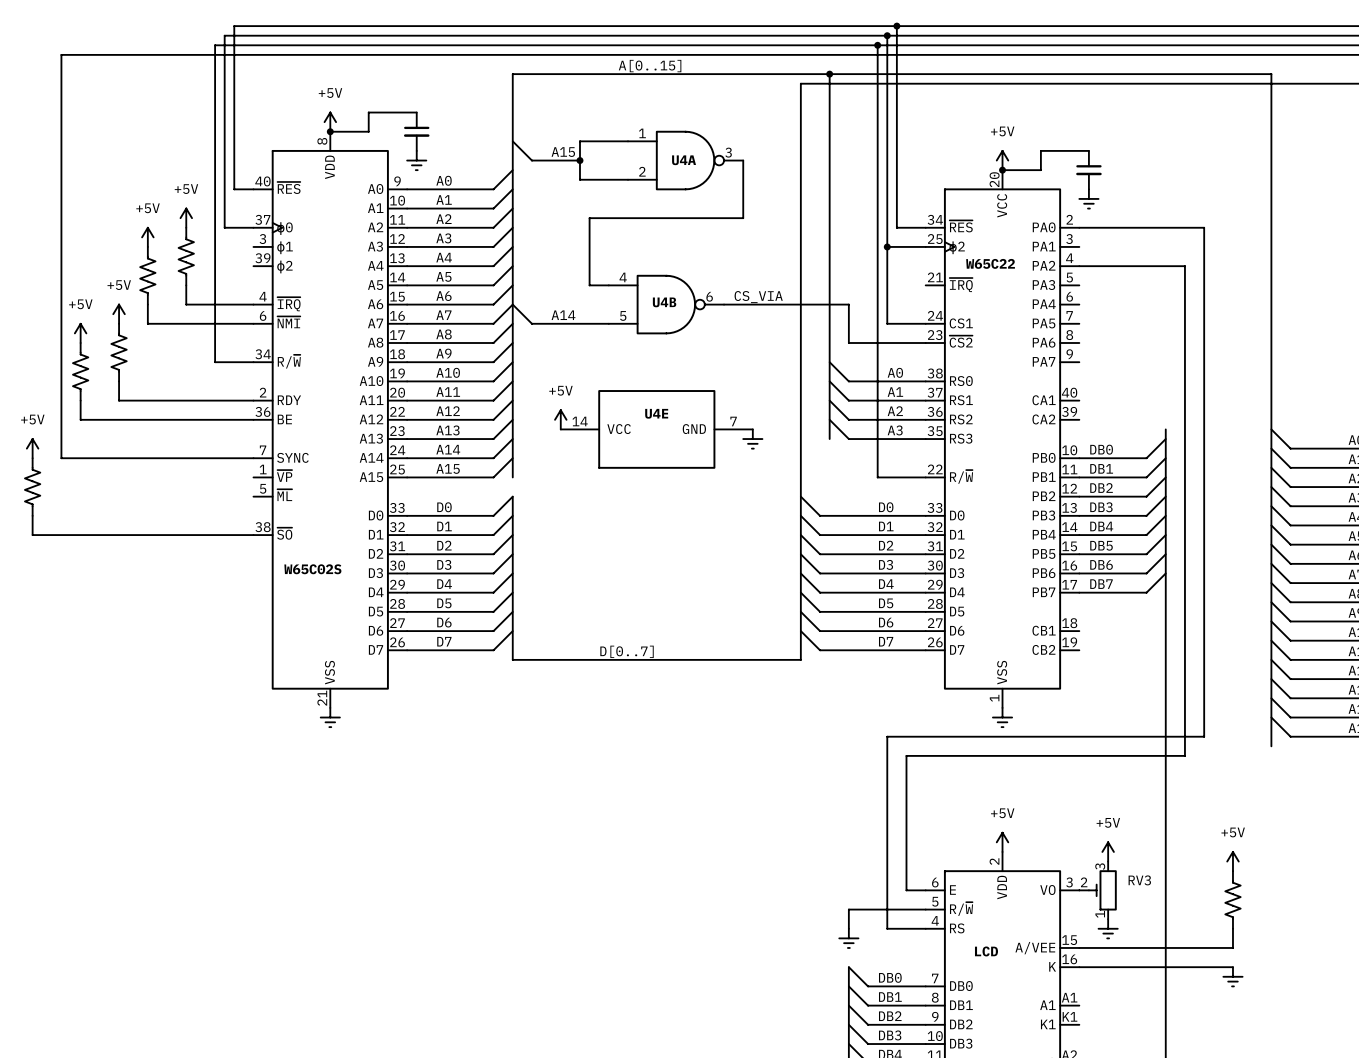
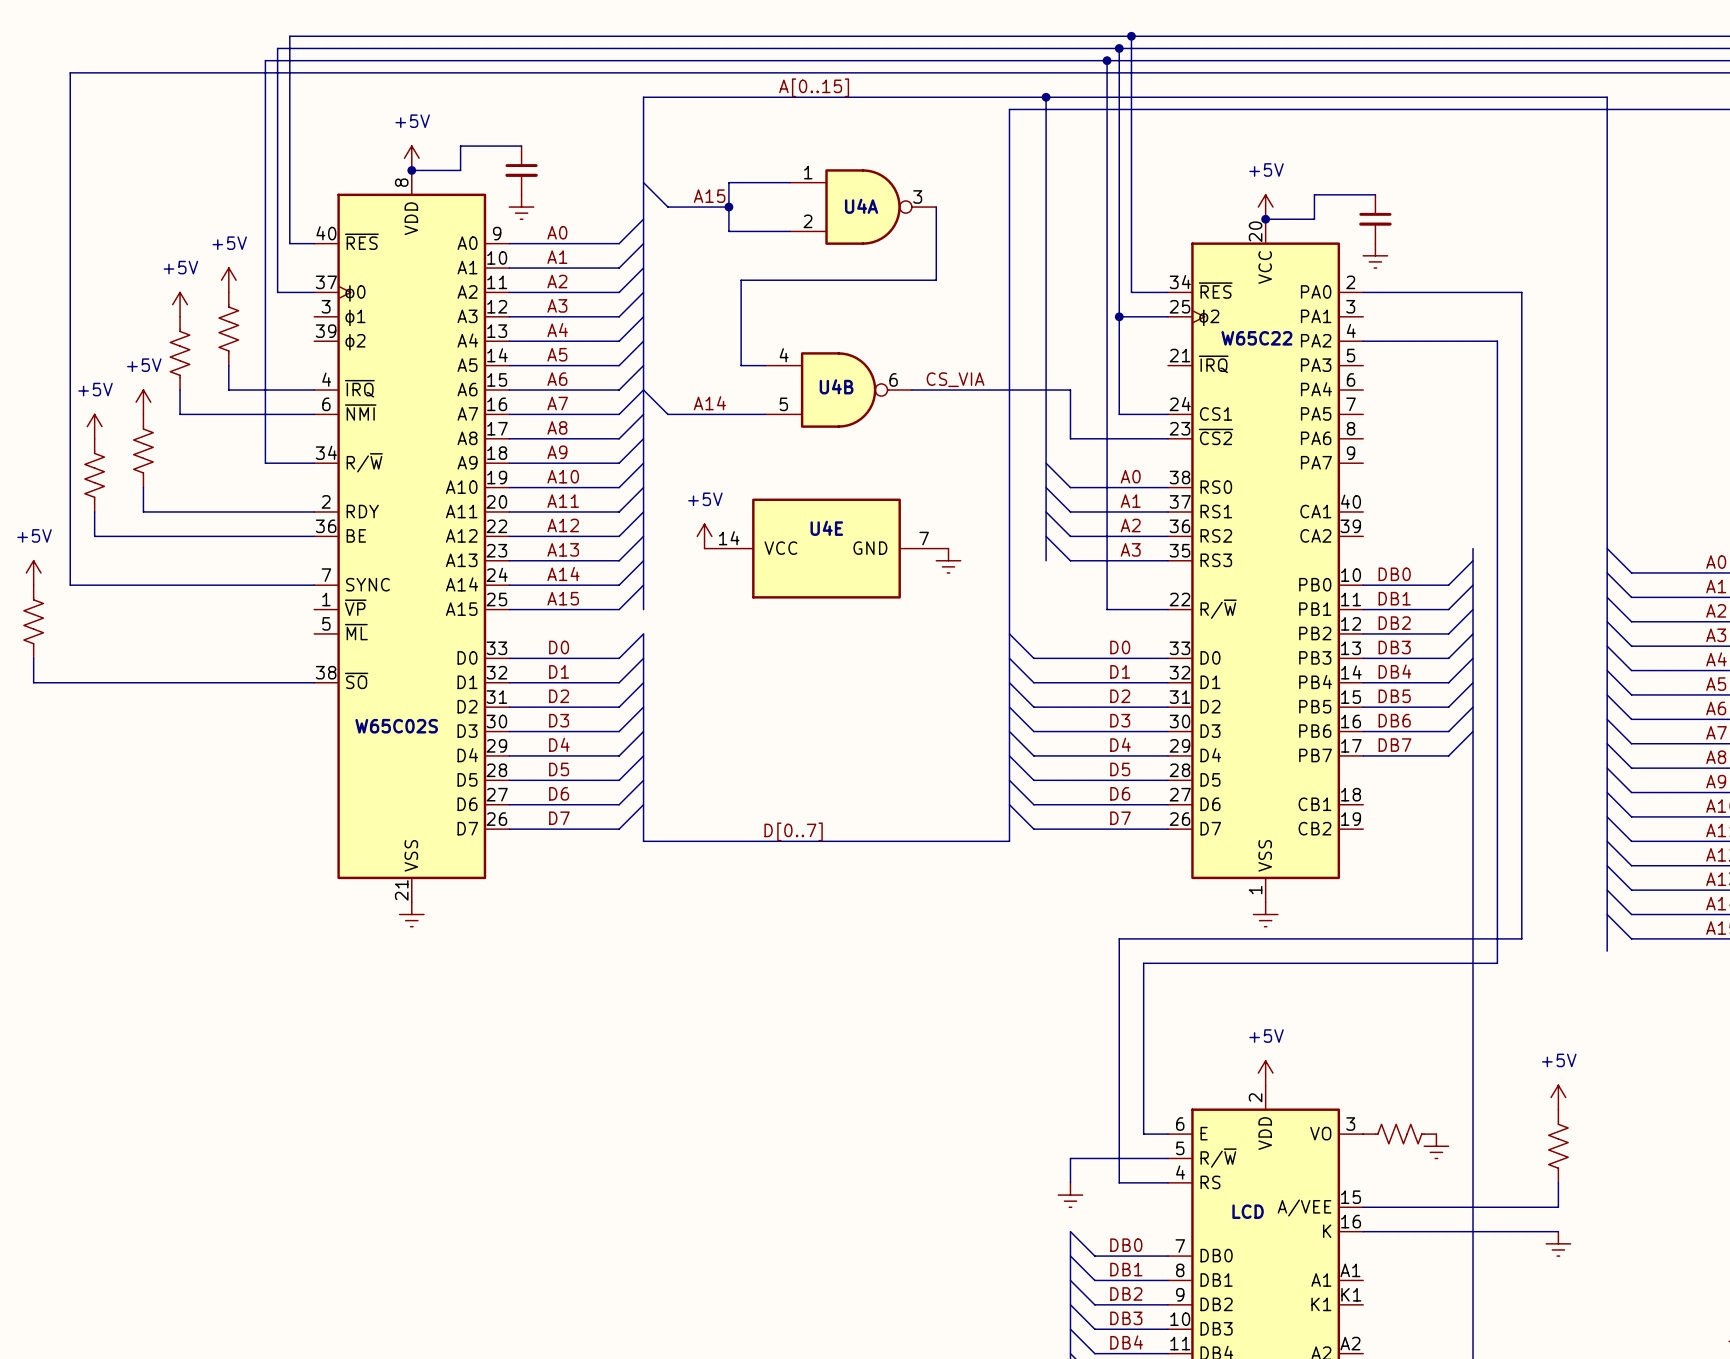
power symbol: +5V (1108, 851) -> none
RV3: (1098, 890) -> none
part: none -> (1399, 1134)
power symbol position: (1108, 928) -> (1436, 1146)

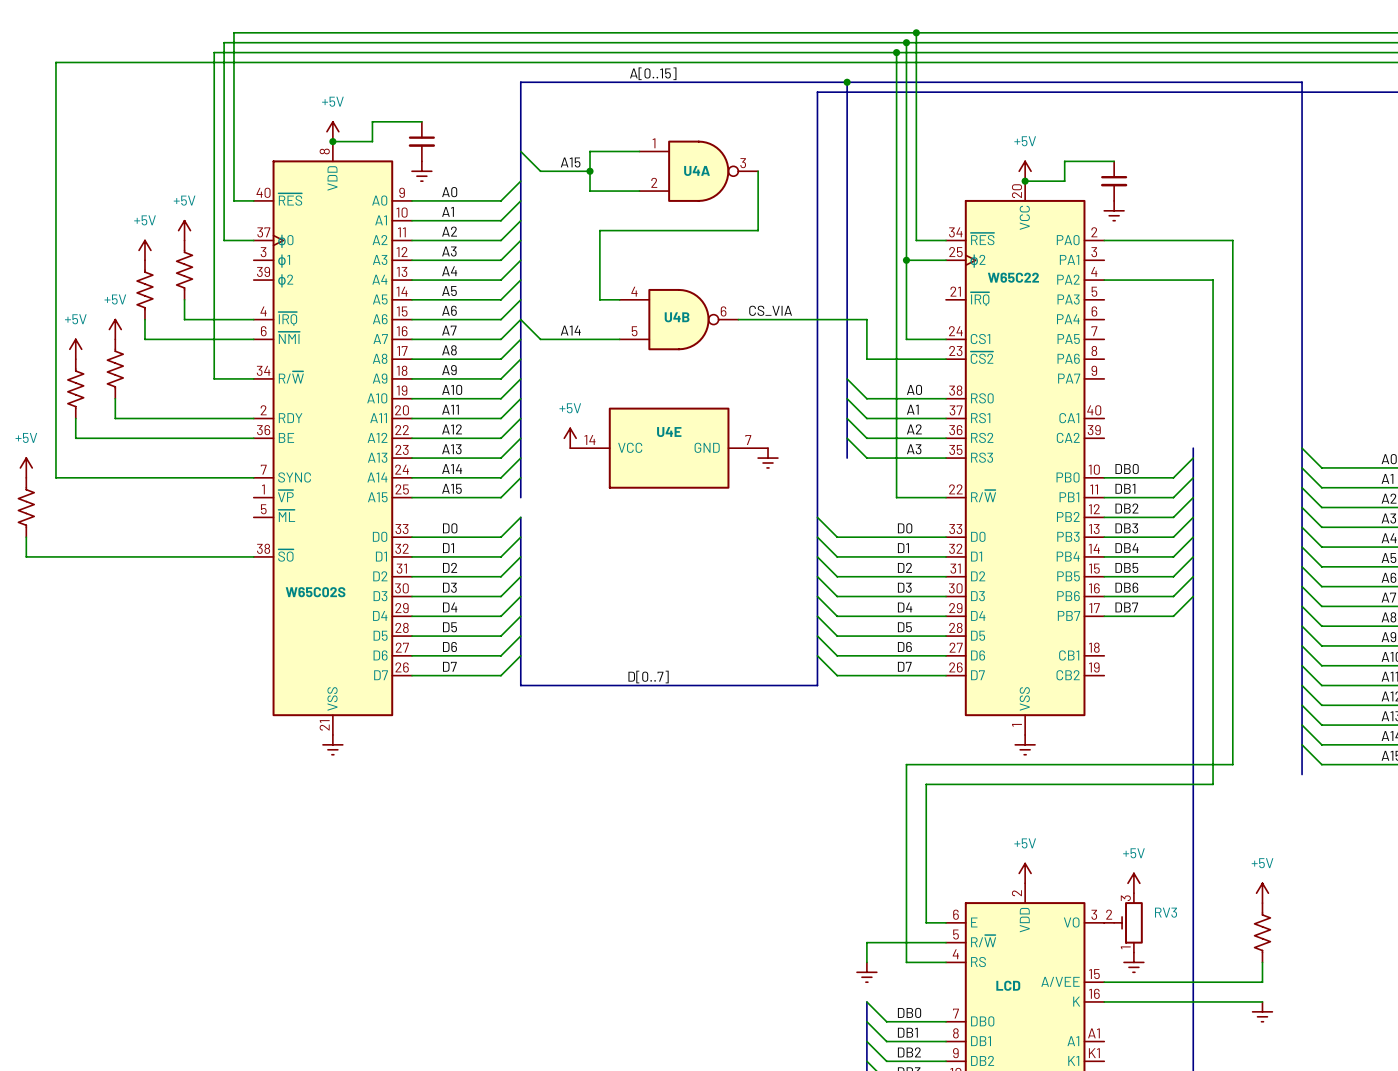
power symbol: none -> +5V (1133, 883)
RV3: none -> (1123, 922)
part: (1399, 1134) -> none
power symbol position: (1436, 1146) -> (1133, 962)

